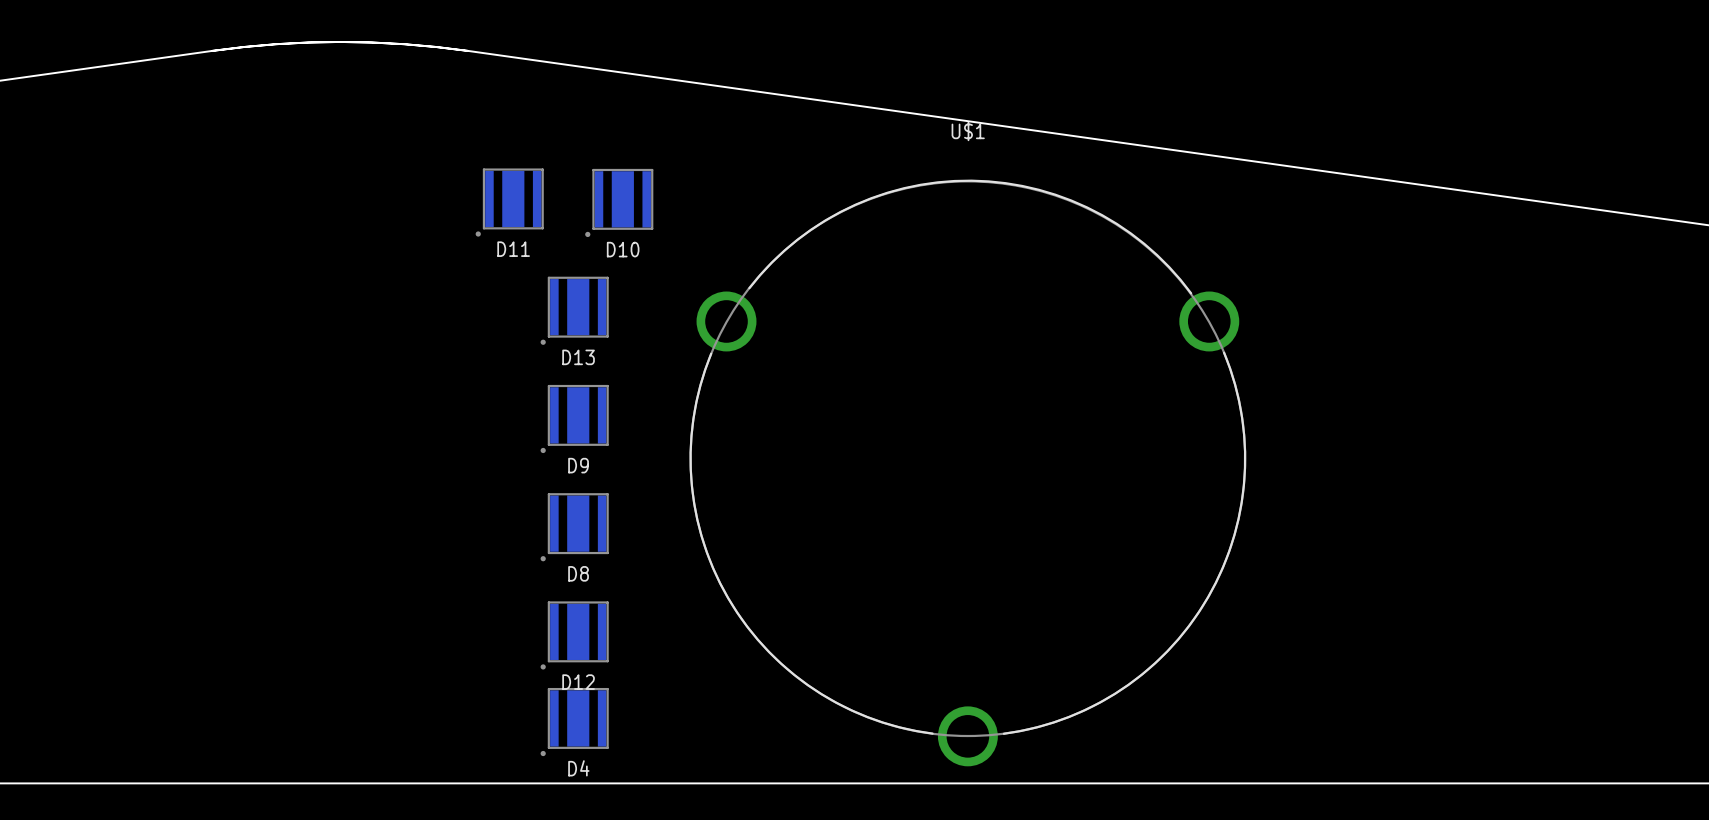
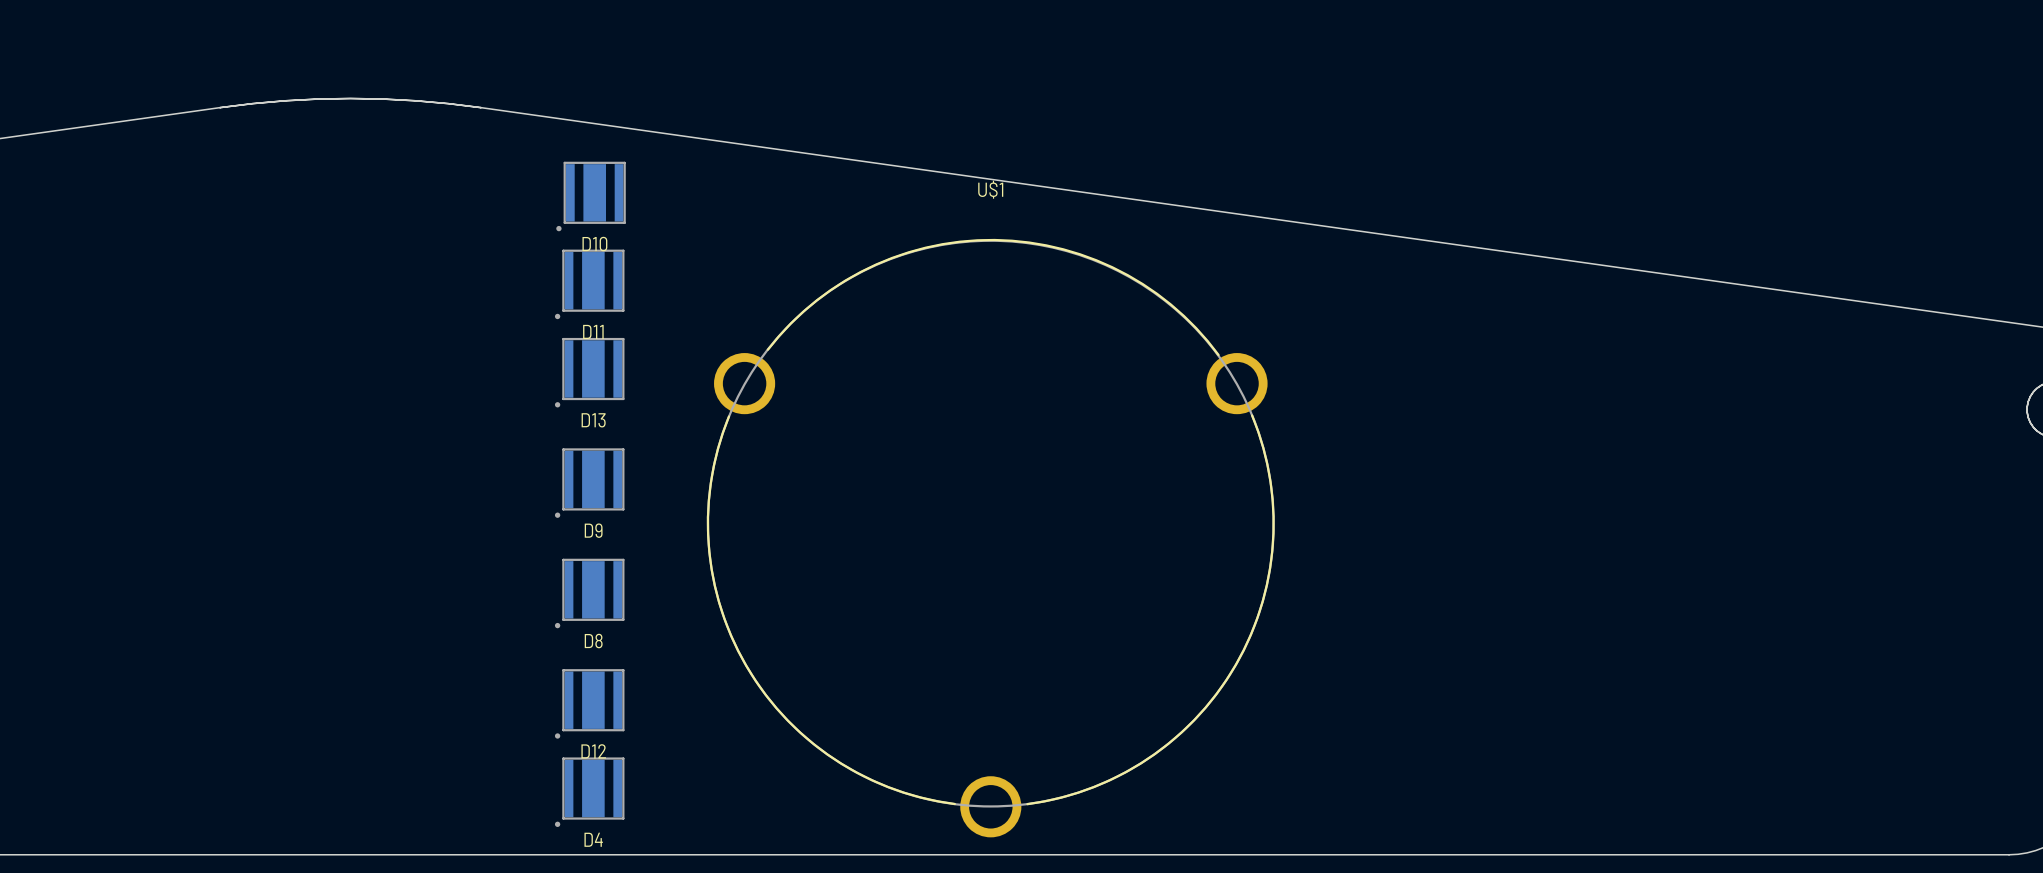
D11 position: (509, 202) -> (589, 284)
D10 position: (619, 202) -> (591, 196)

